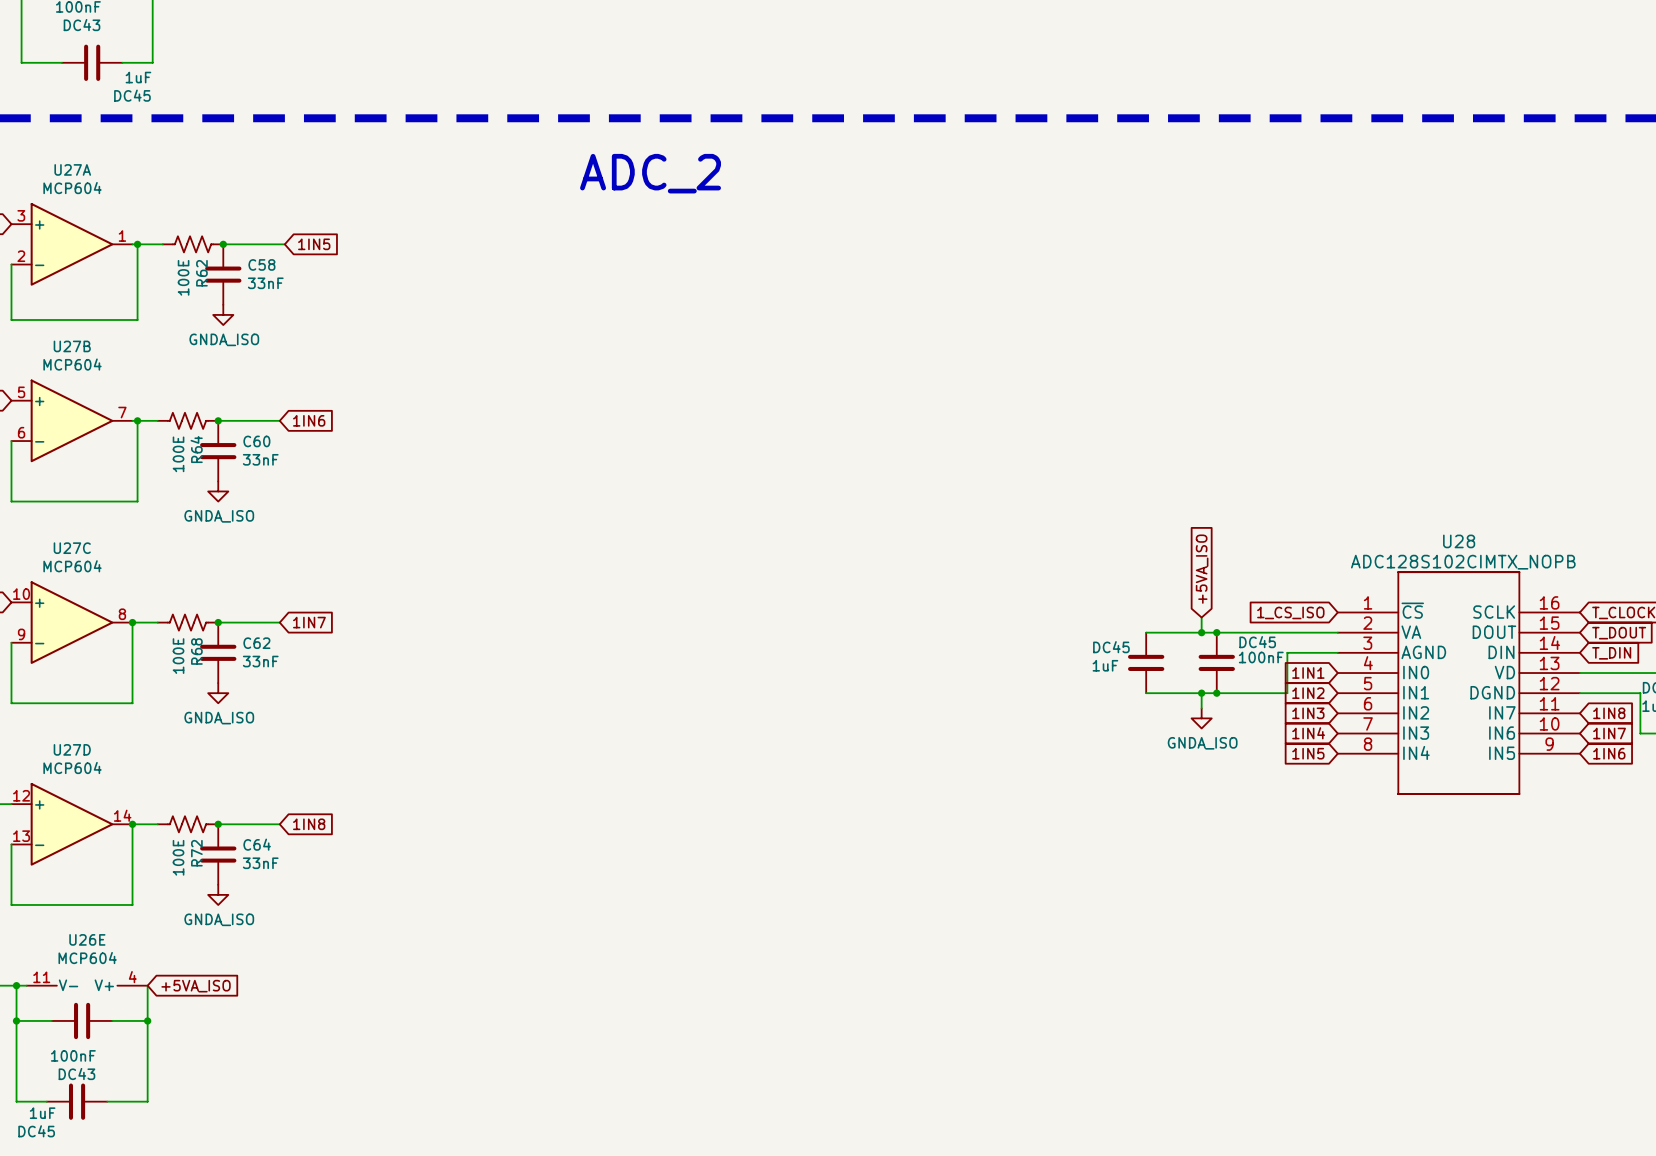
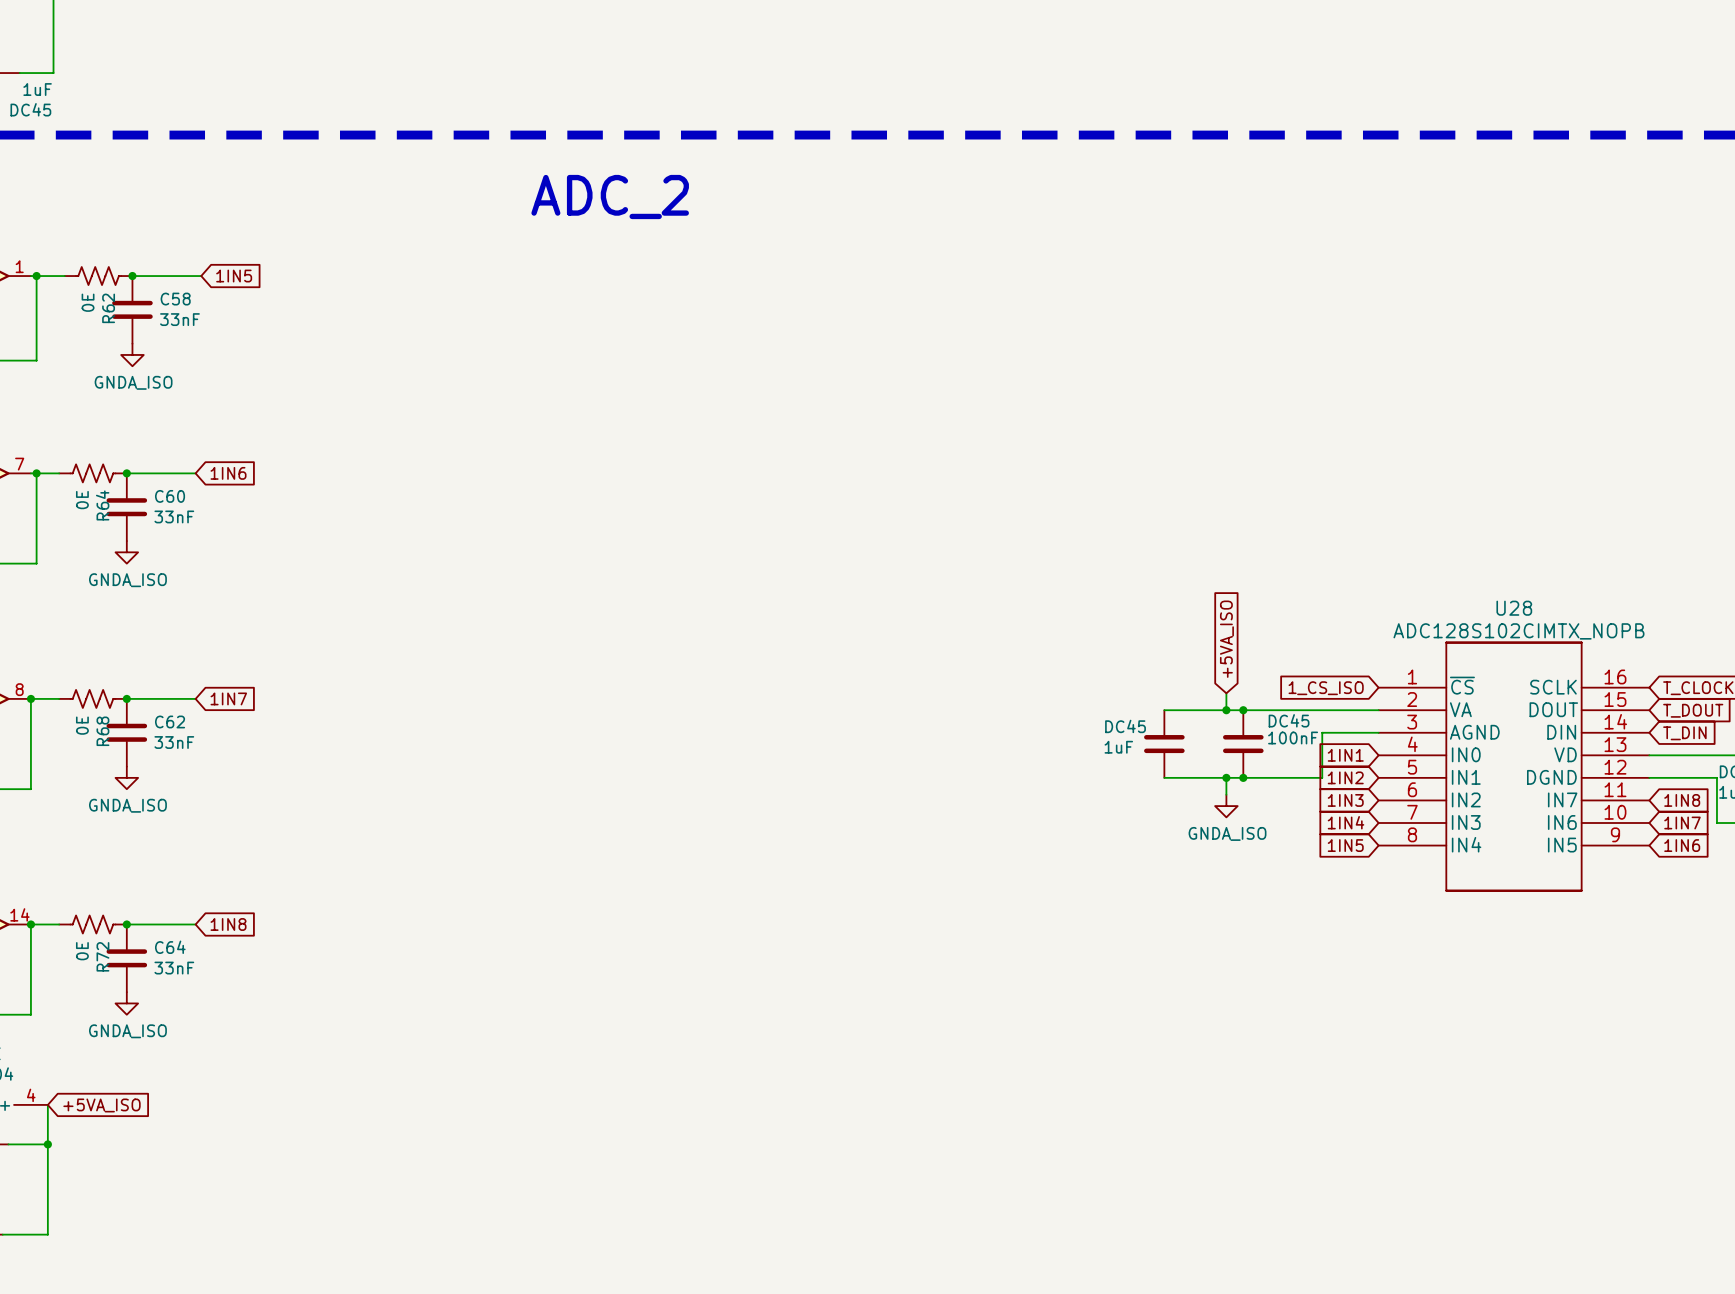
R62 value: 100E (183, 277) -> 0E (88, 302)
R64 value: 100E (178, 454) -> 0E (82, 500)
R68 value: 100E (178, 656) -> 0E (82, 725)
R72 value: 100E (178, 857) -> 0E (82, 951)

